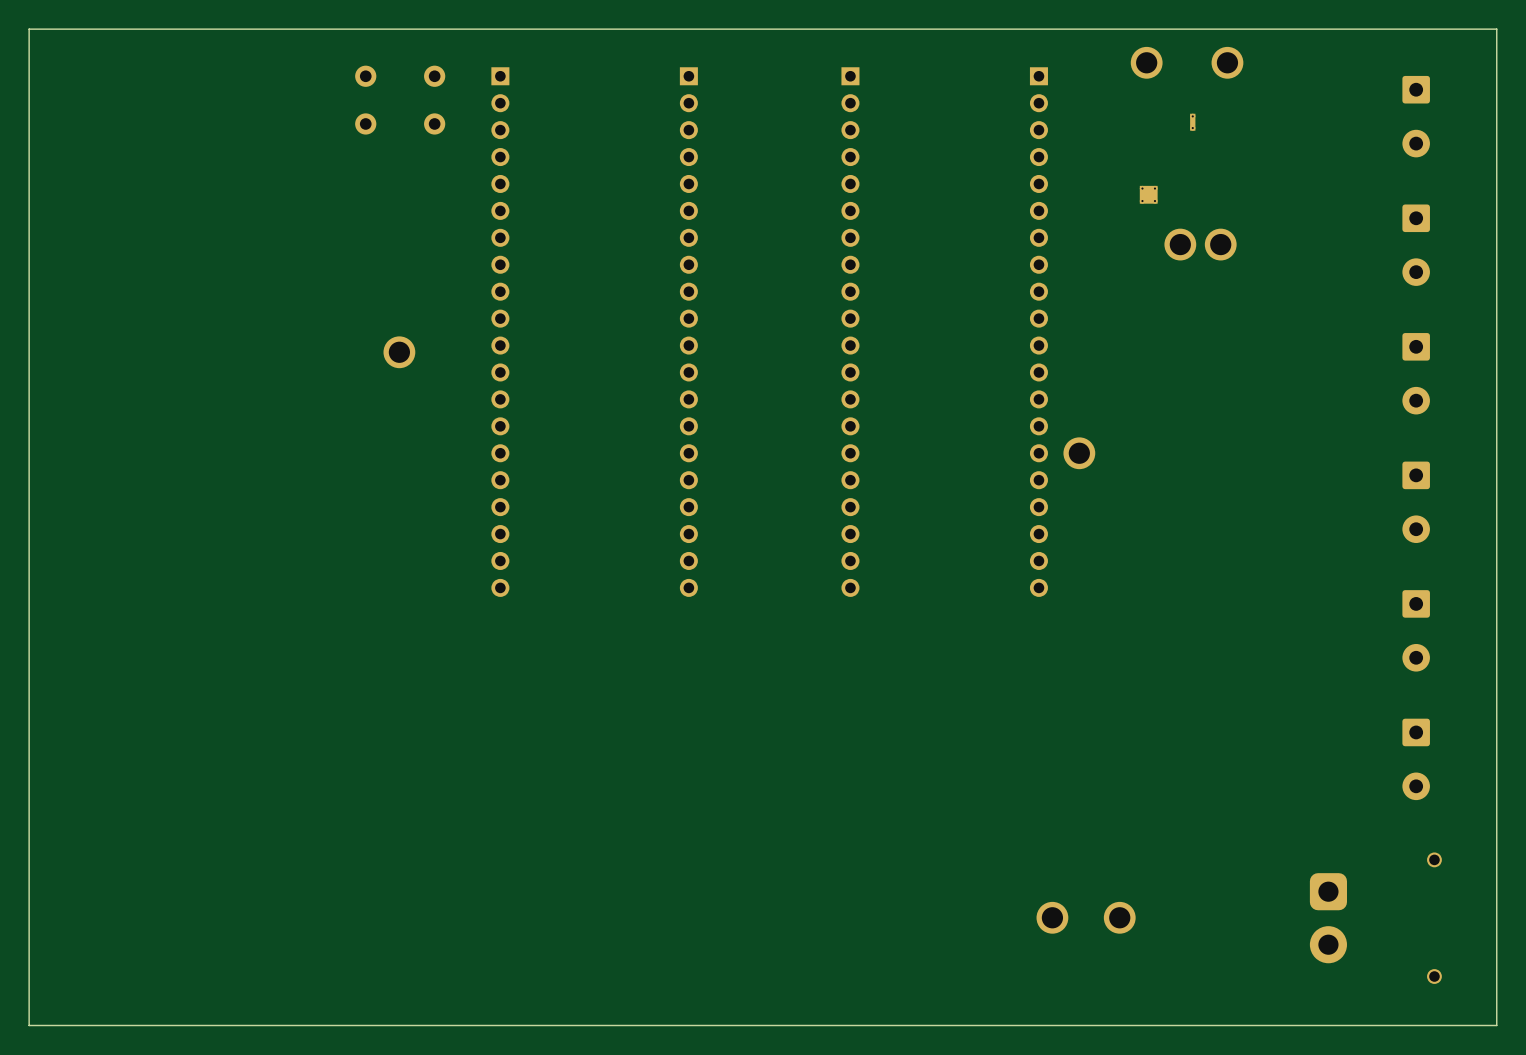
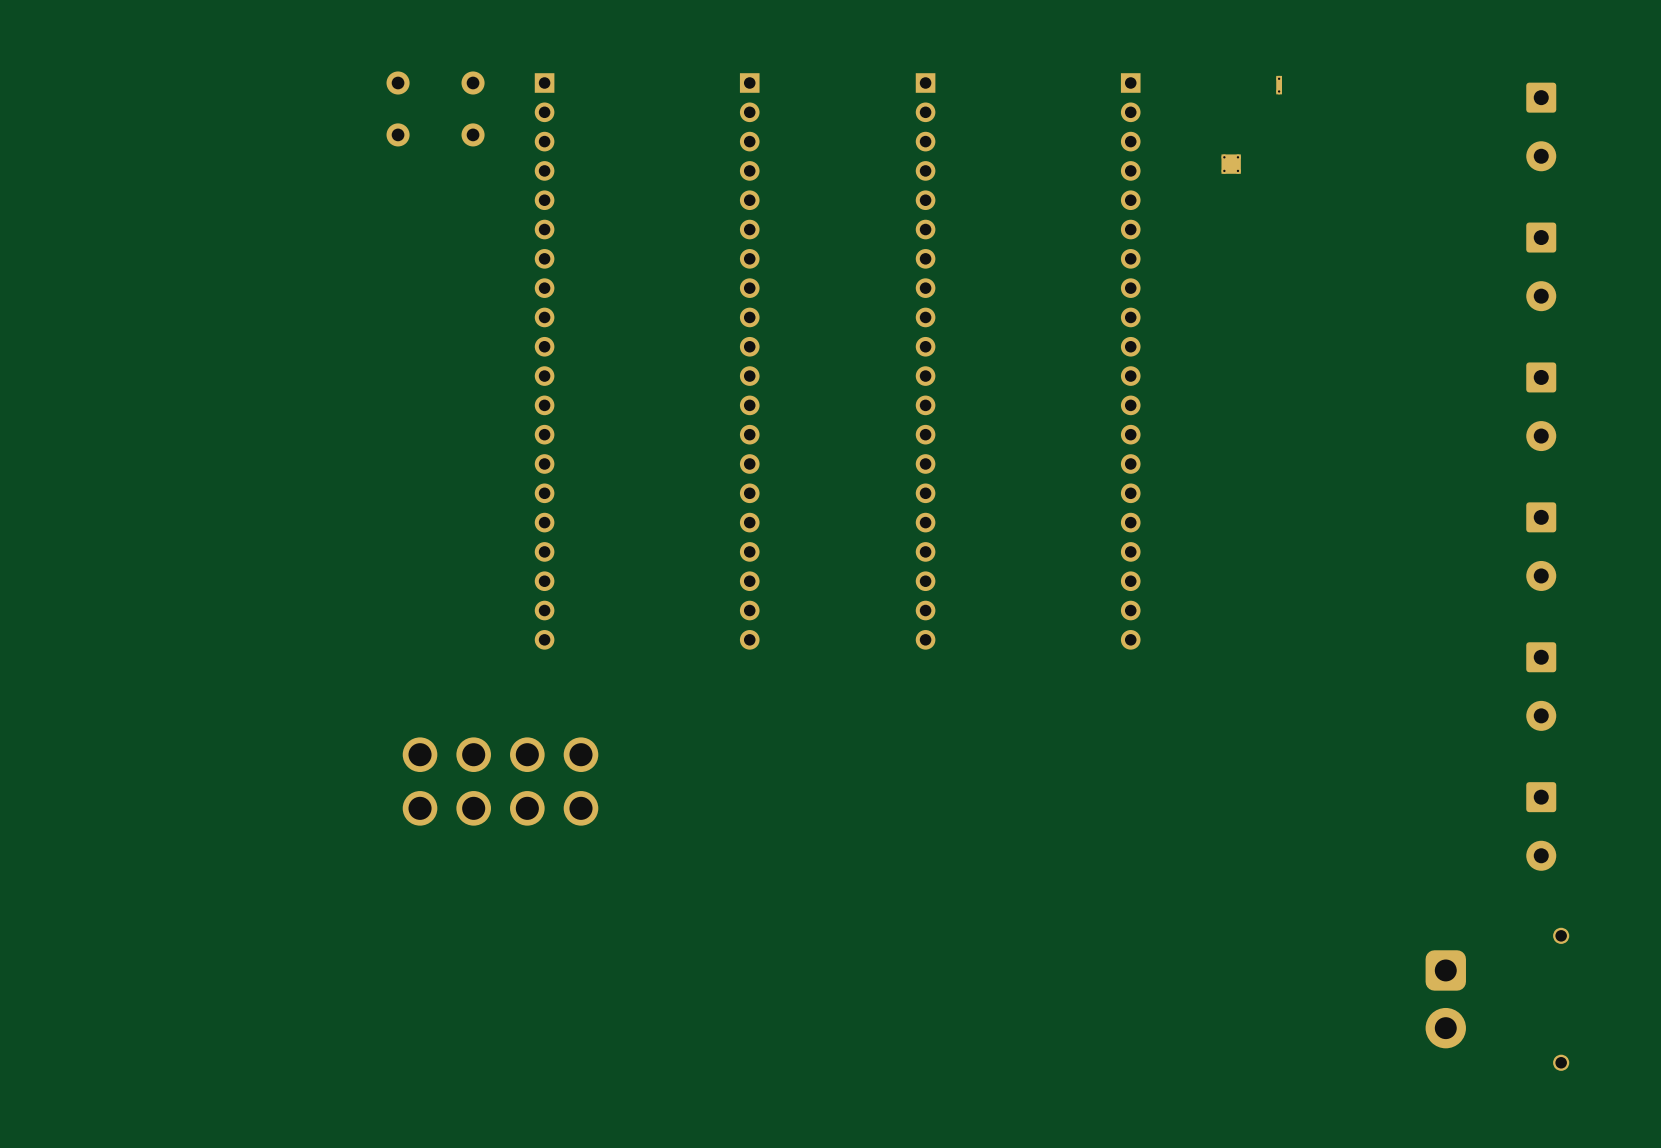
board edge: (1496, 29) (29, 29) (29, 1025) (1496, 1025) (1496, 29) -> none
part: (1146, 62) -> none
part: (1227, 62) -> none
part position: (1192, 122) -> (1279, 85)
part position: (1148, 194) -> (1231, 164)
part: (1180, 244) -> none
part: (1220, 244) -> none
part: (399, 352) -> none
part: (1079, 453) -> none
part: none -> (420, 754)
part: none -> (473, 754)
part: none -> (527, 754)
part: none -> (580, 754)
part: none -> (420, 808)
part: none -> (473, 808)
part: none -> (527, 808)
part: none -> (580, 808)
part: (1052, 917) -> none
part: (1119, 917) -> none

